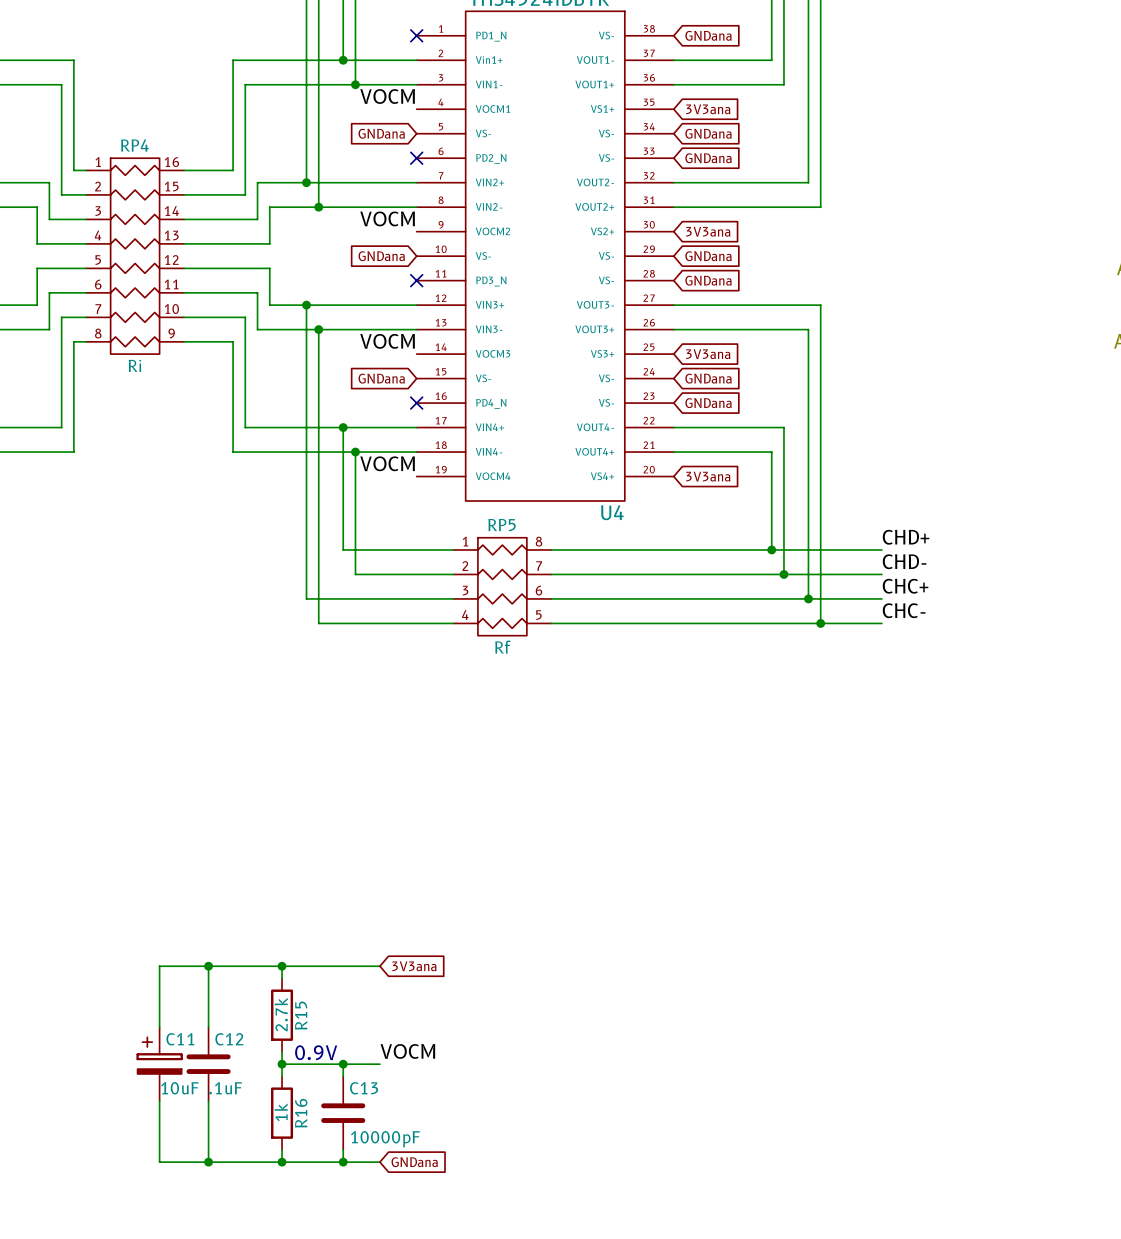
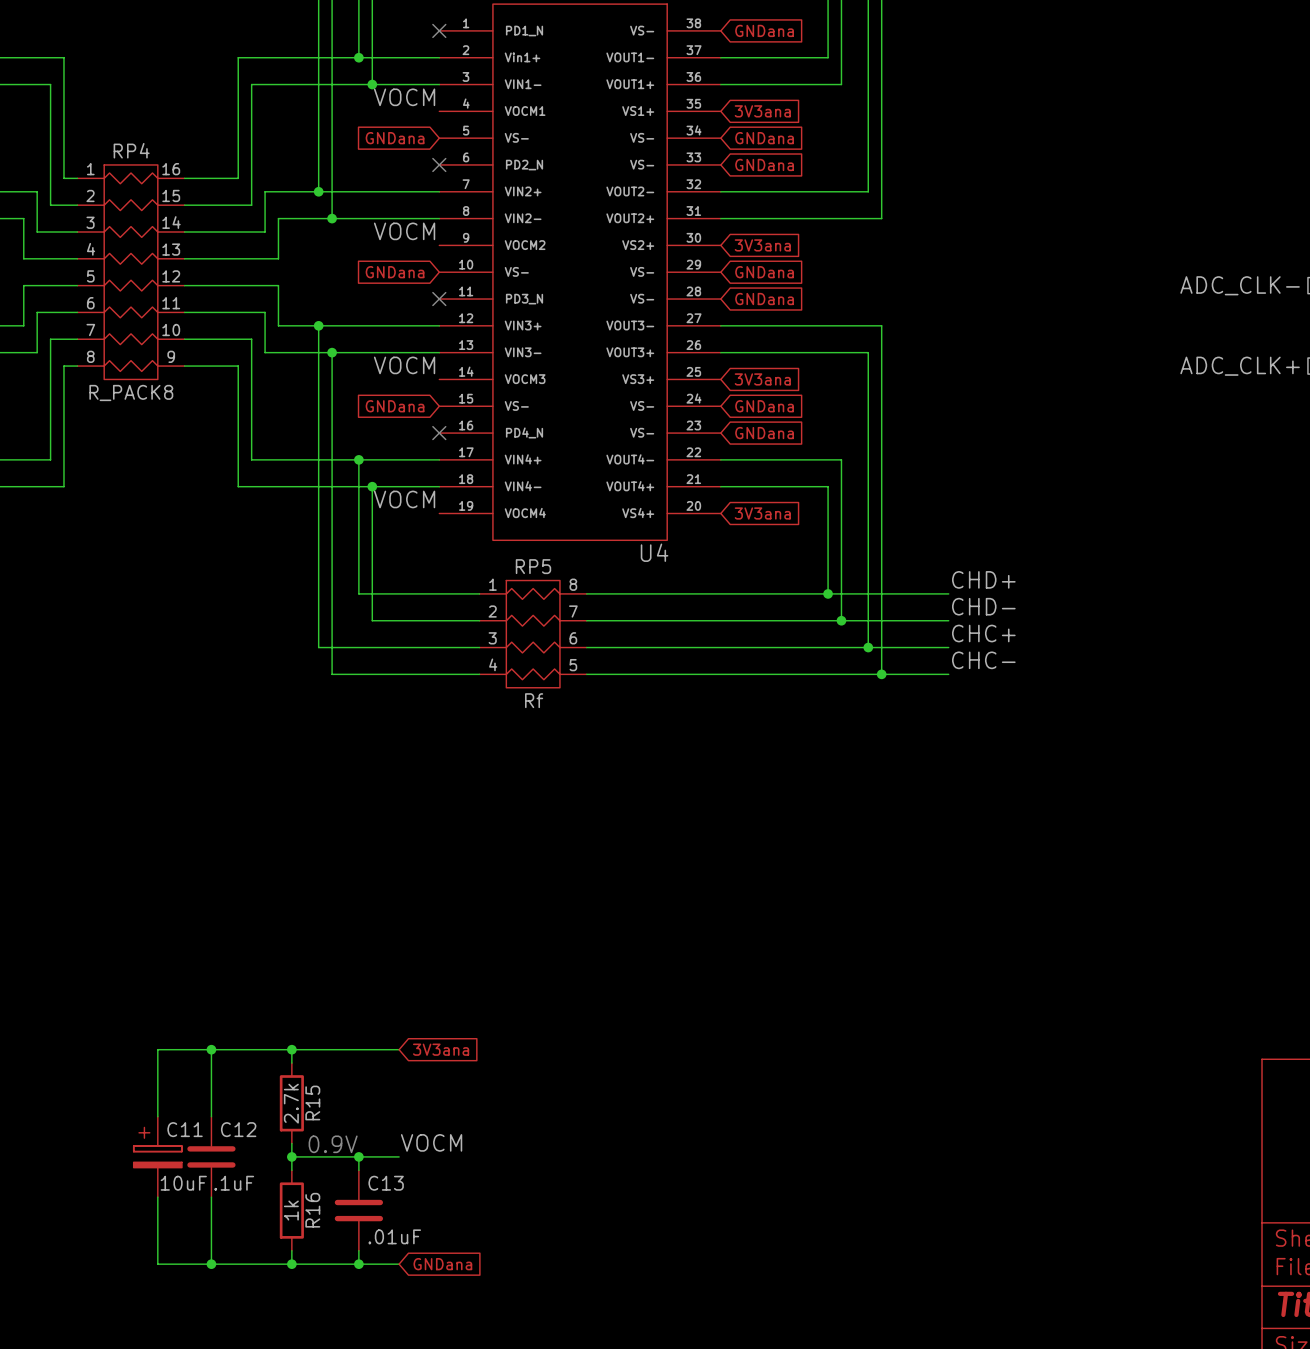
RP4 value: Ri (134, 365) -> R_PACK8 (131, 392)
C13 value: 10000pF (385, 1139) -> .01uF (394, 1236)

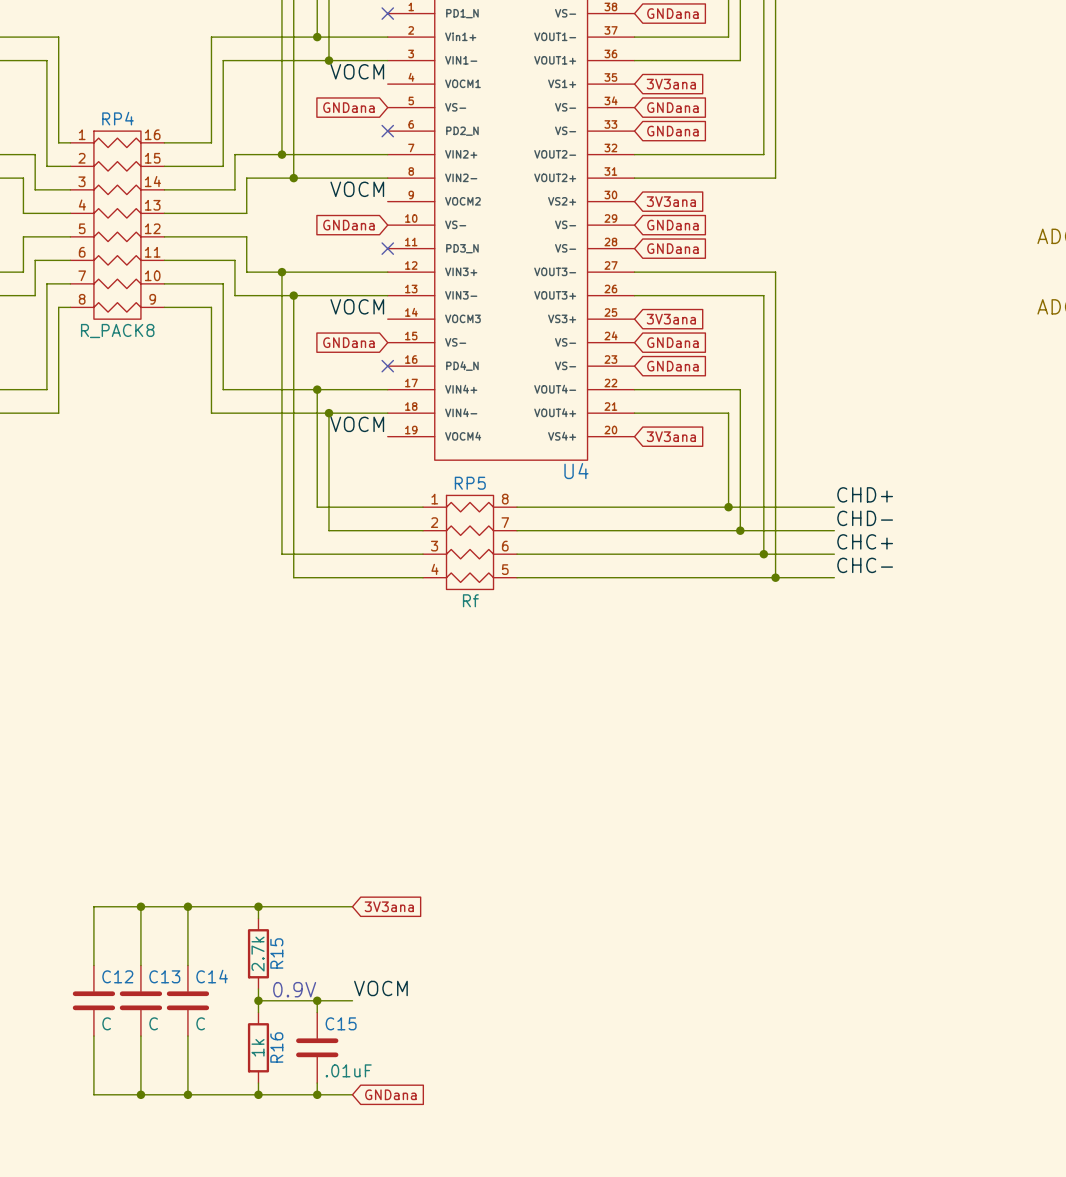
wire: none -> (140, 906) (93, 906) (93, 965)
junction: none -> (140, 906)
C12 name: C12 (238, 1129) -> C14 (212, 976)
C12: none -> C (93, 1000)
C11: 10uF (157, 1156) -> none
C13: none -> C (140, 1000)
C12 value: .1uF (234, 1183) -> C (200, 1023)
C13 name: C13 (386, 1183) -> C15 (341, 1023)
wire: none -> (93, 1036) (93, 1094) (140, 1094)
junction: none -> (140, 1094)

